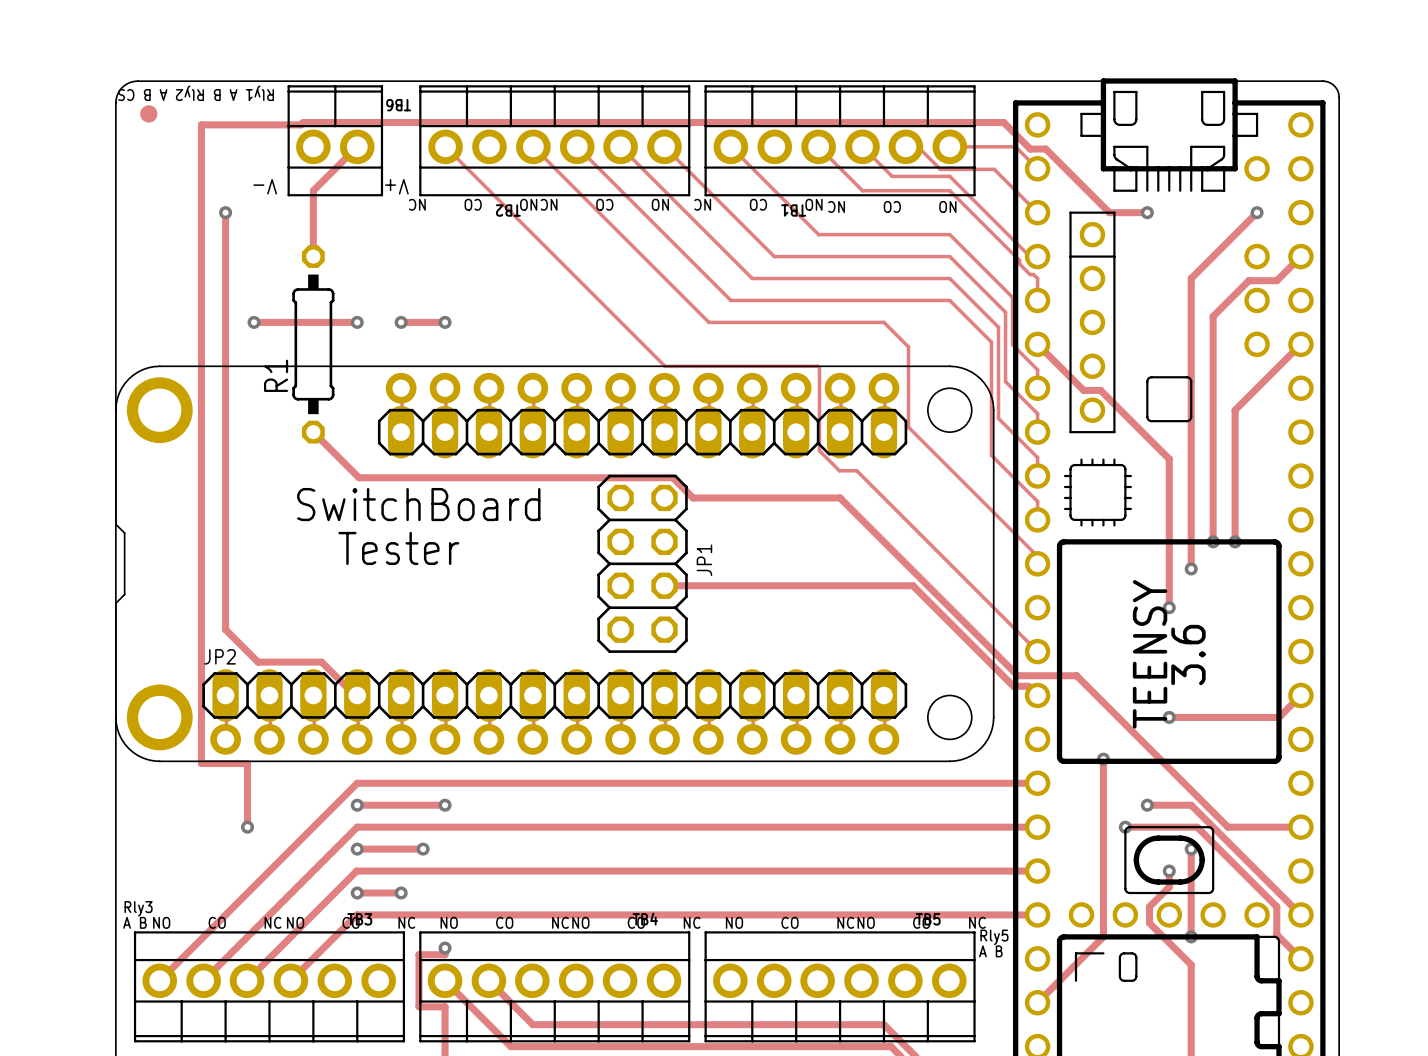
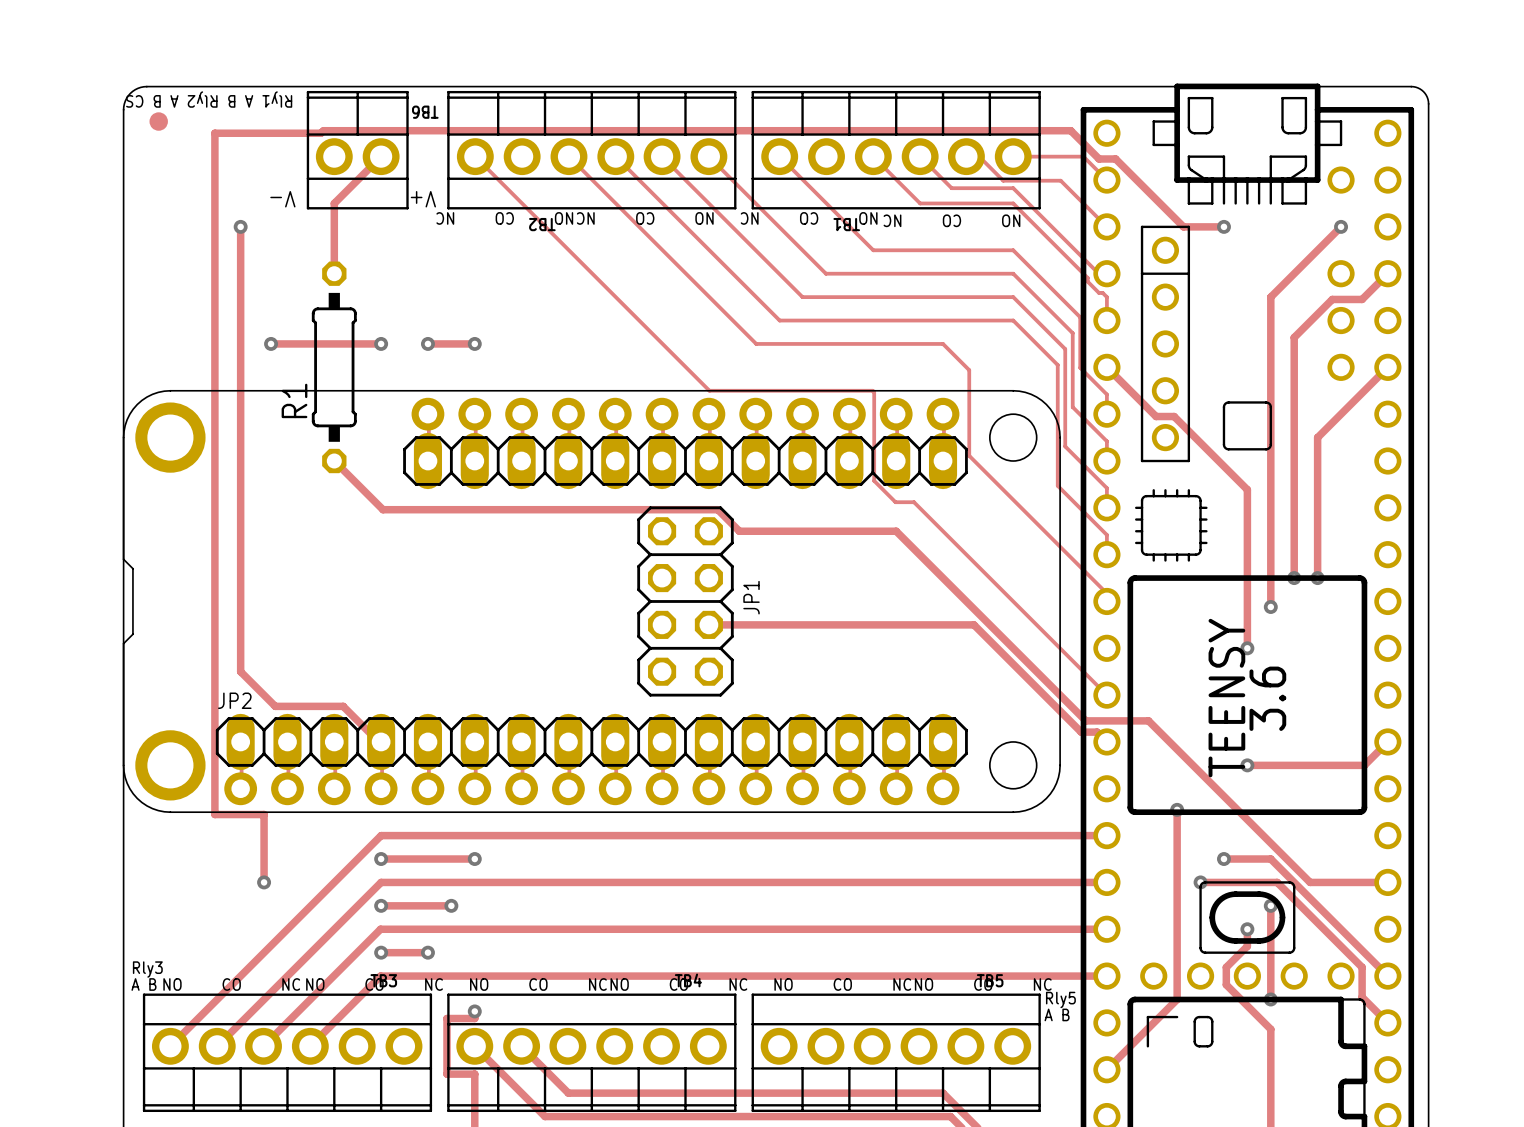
text: SwitchBoard (418, 504) -> none
text: Tester (398, 548) -> none

